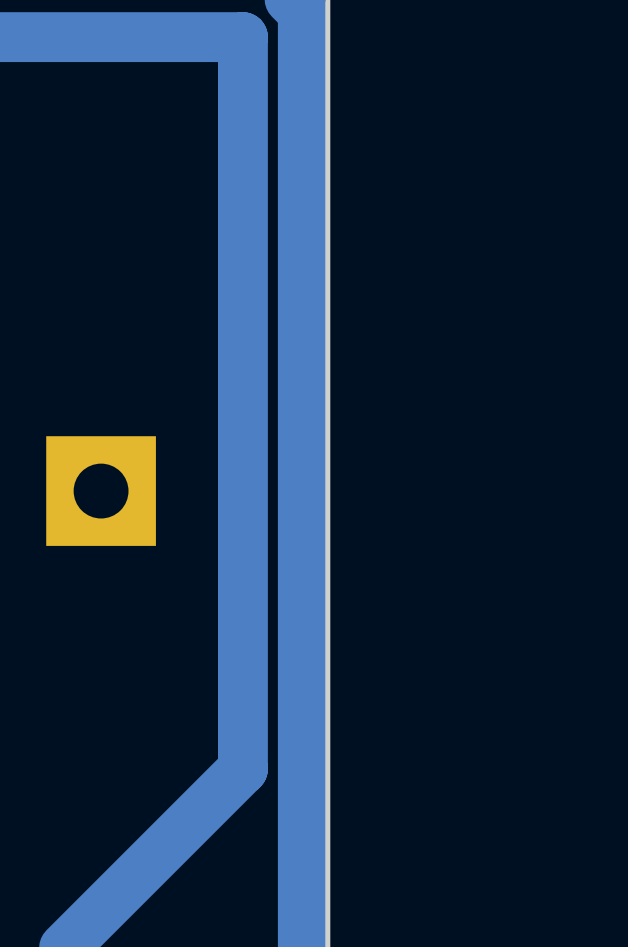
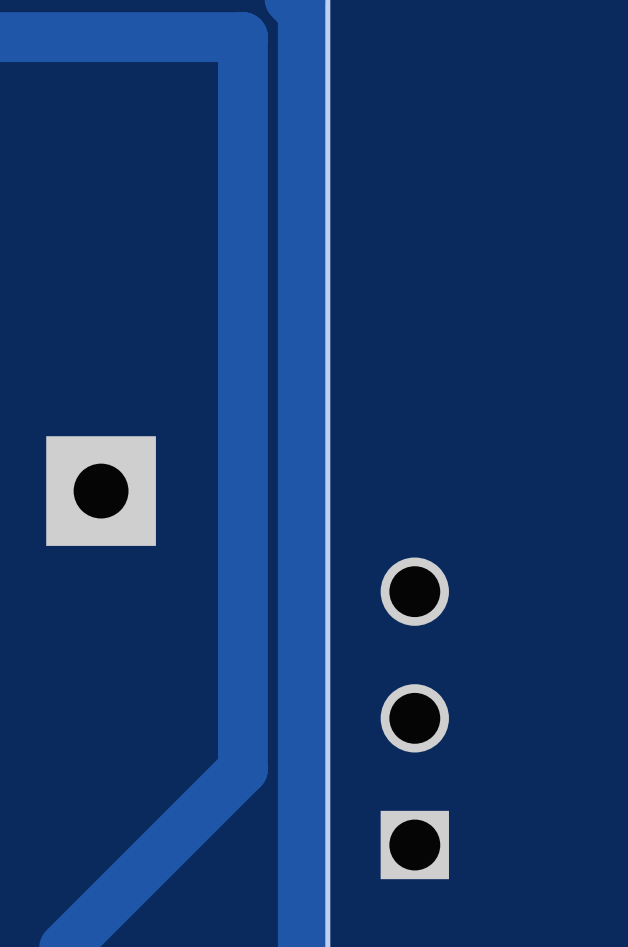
part: none -> (414, 718)

